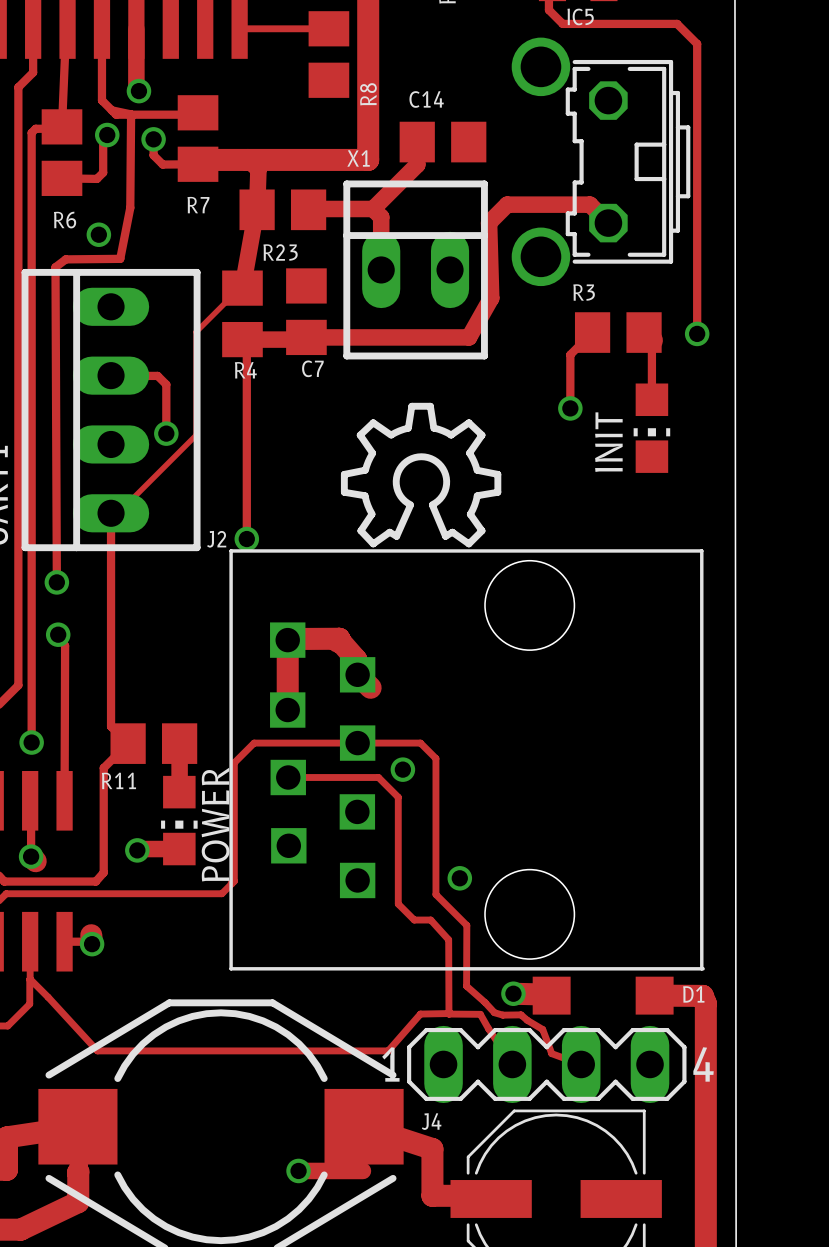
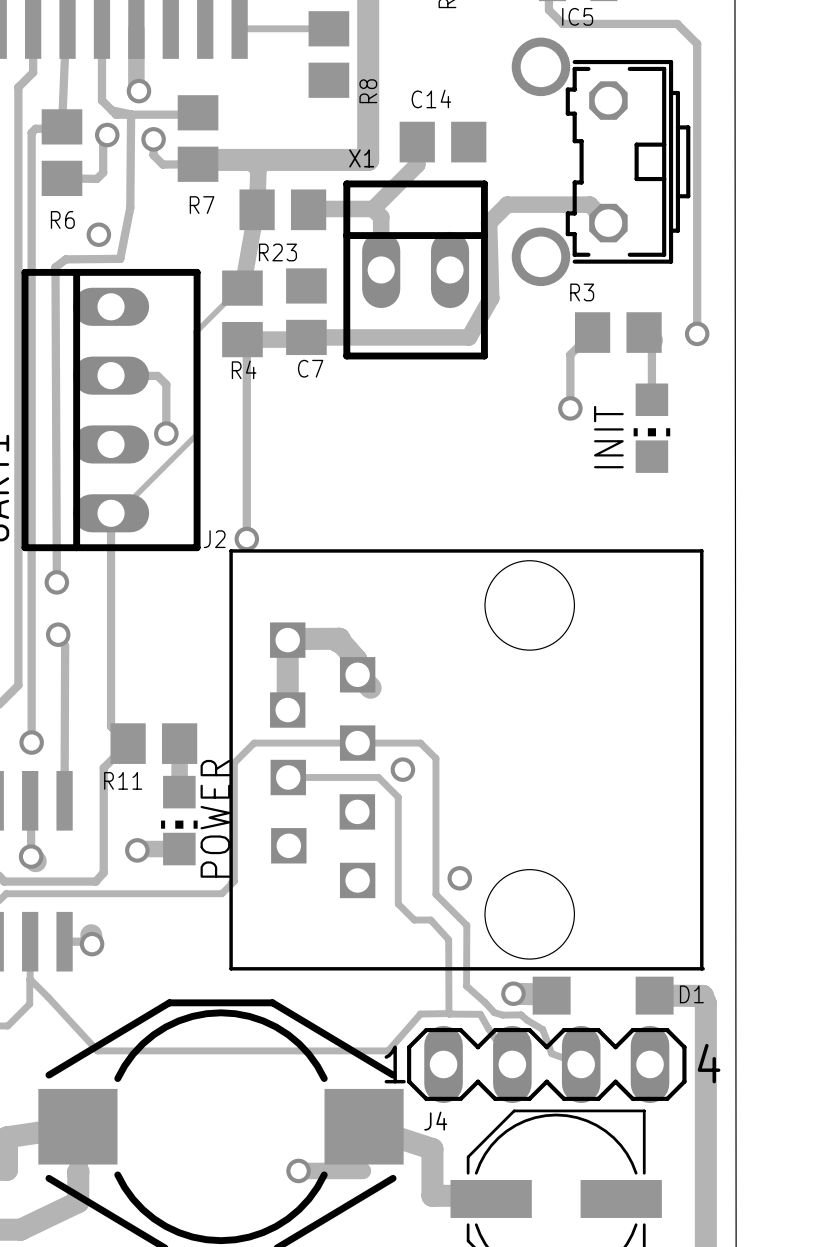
drawing: [340, 402, 502, 548] -> none

